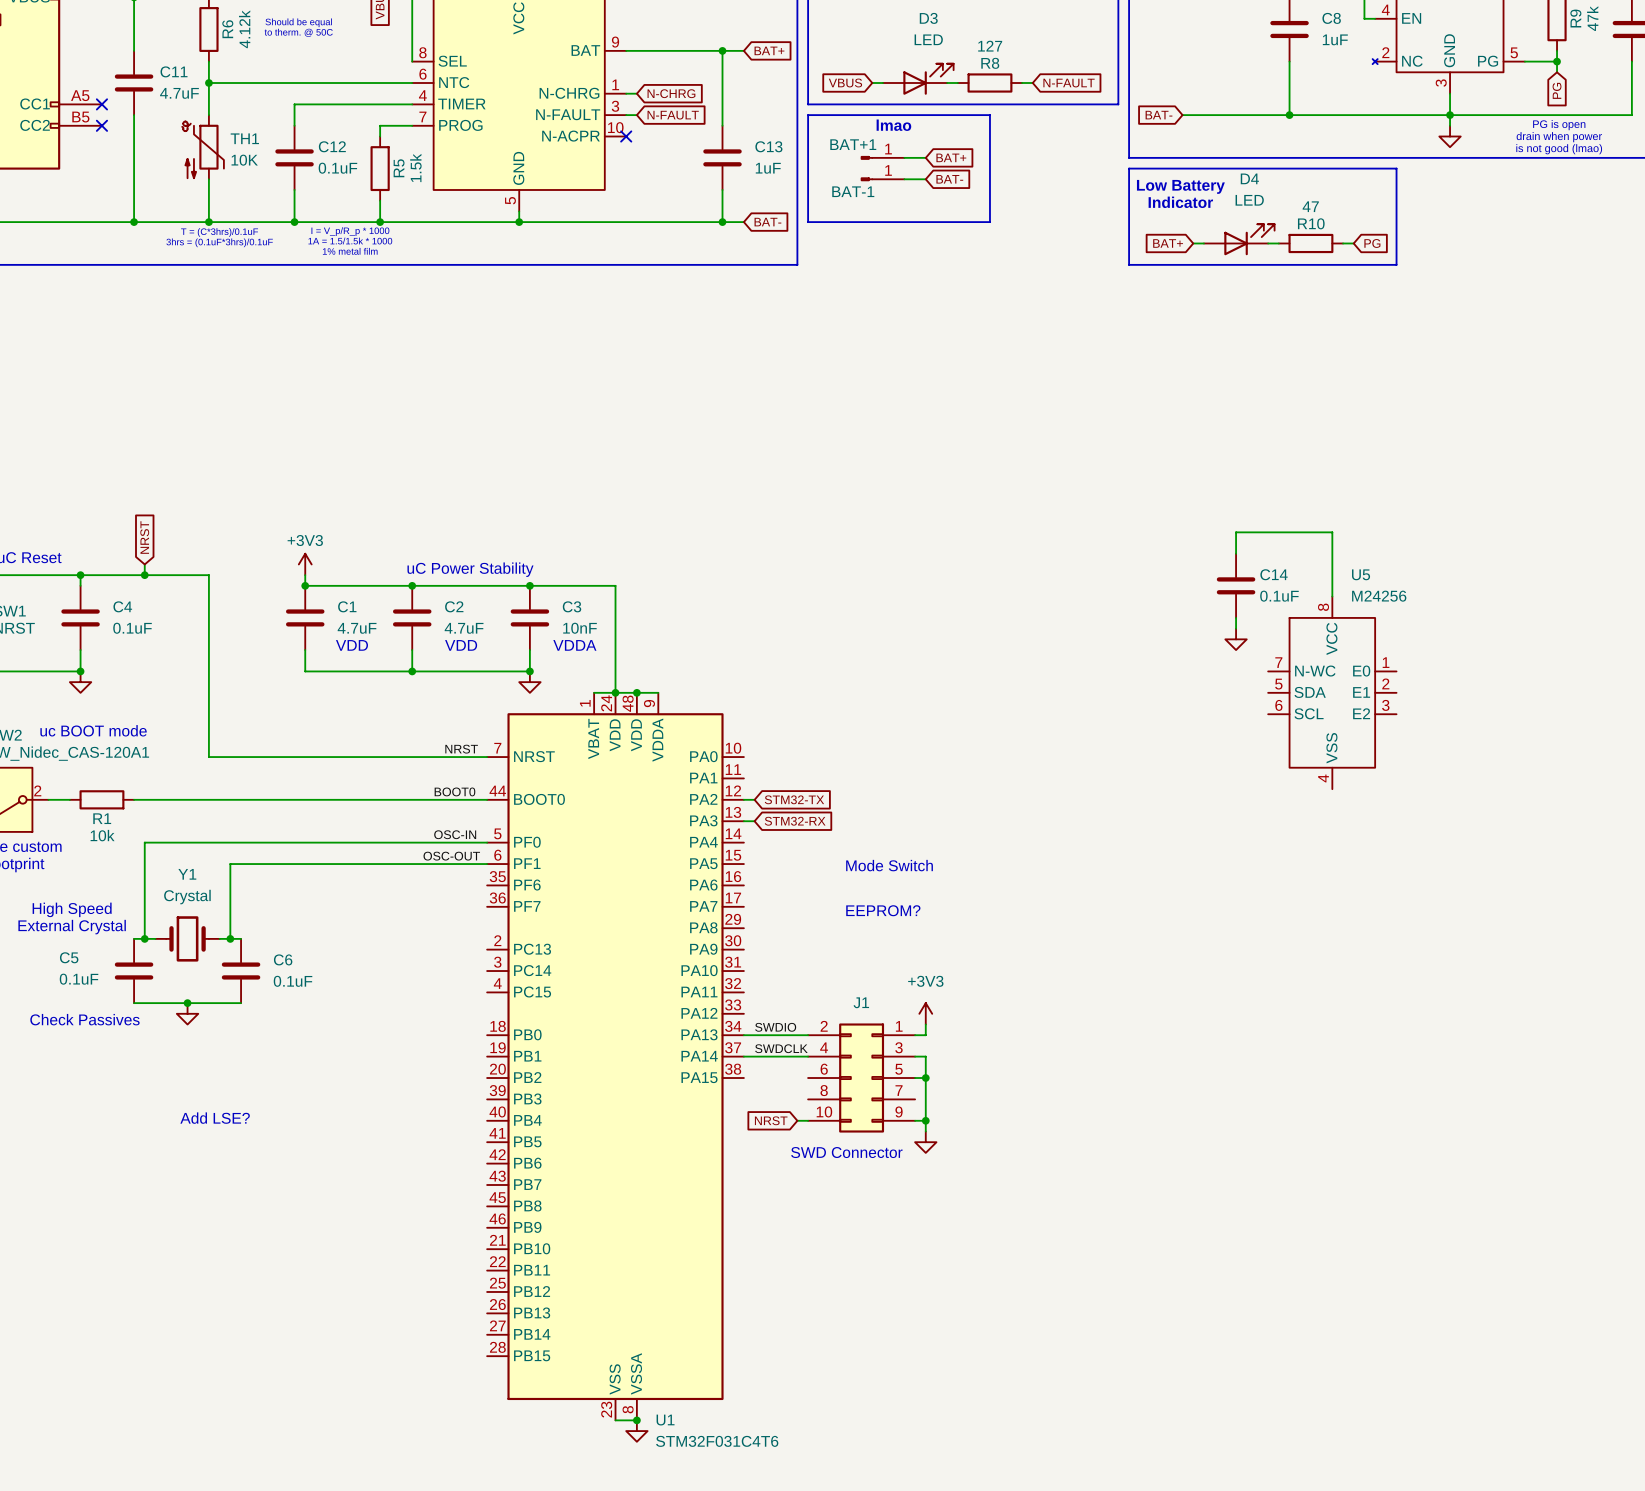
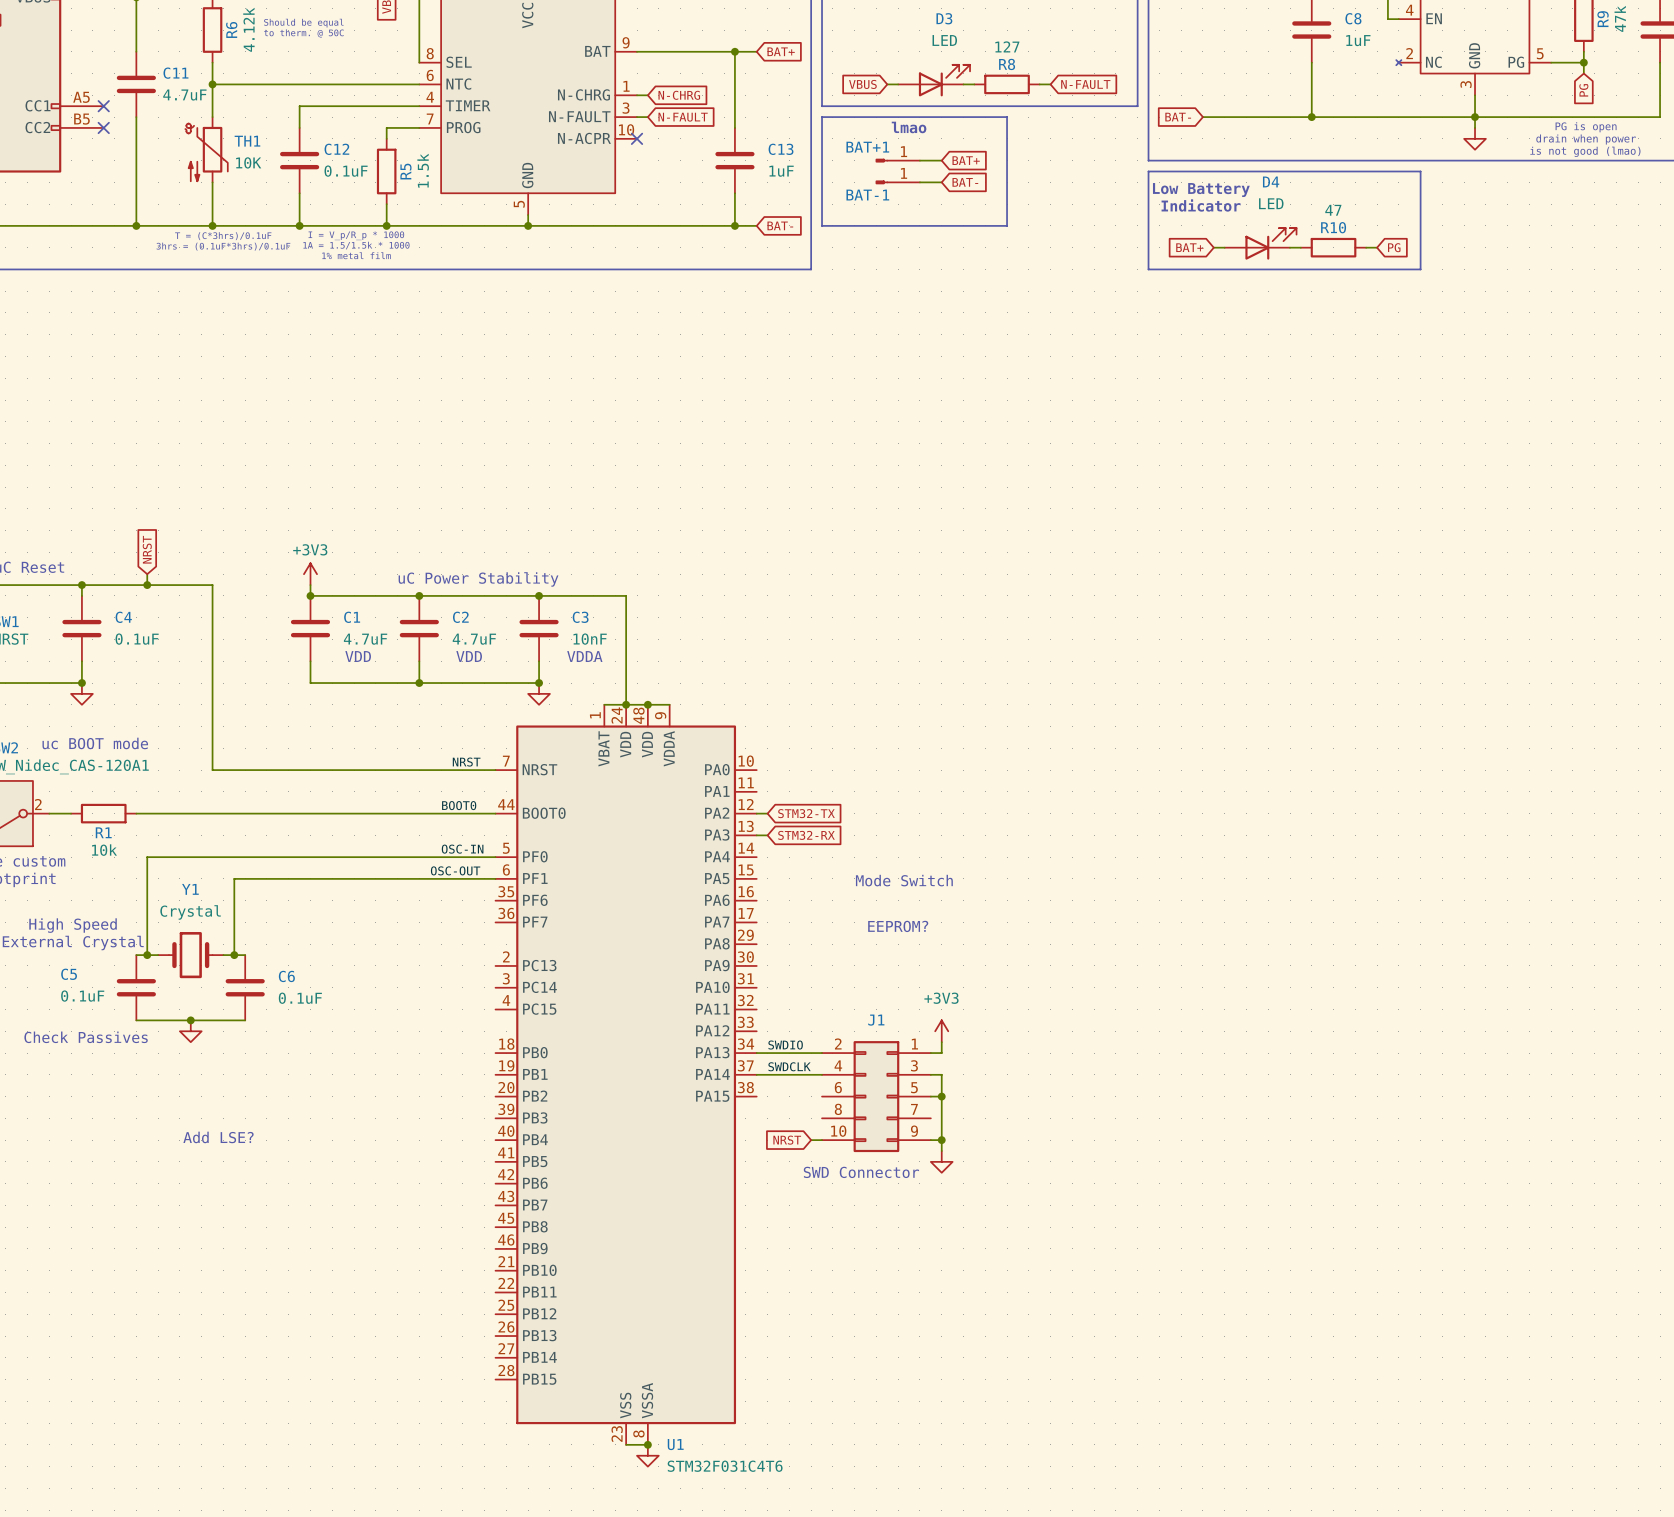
wire: (1236, 553) (1236, 532) (1332, 532) (1332, 596) -> none
C14: 0.1uF (1236, 585) -> none
wire: (1236, 617) (1236, 628) -> none
power symbol: (1236, 639) -> none
U5: M24256 (1332, 692) -> none

